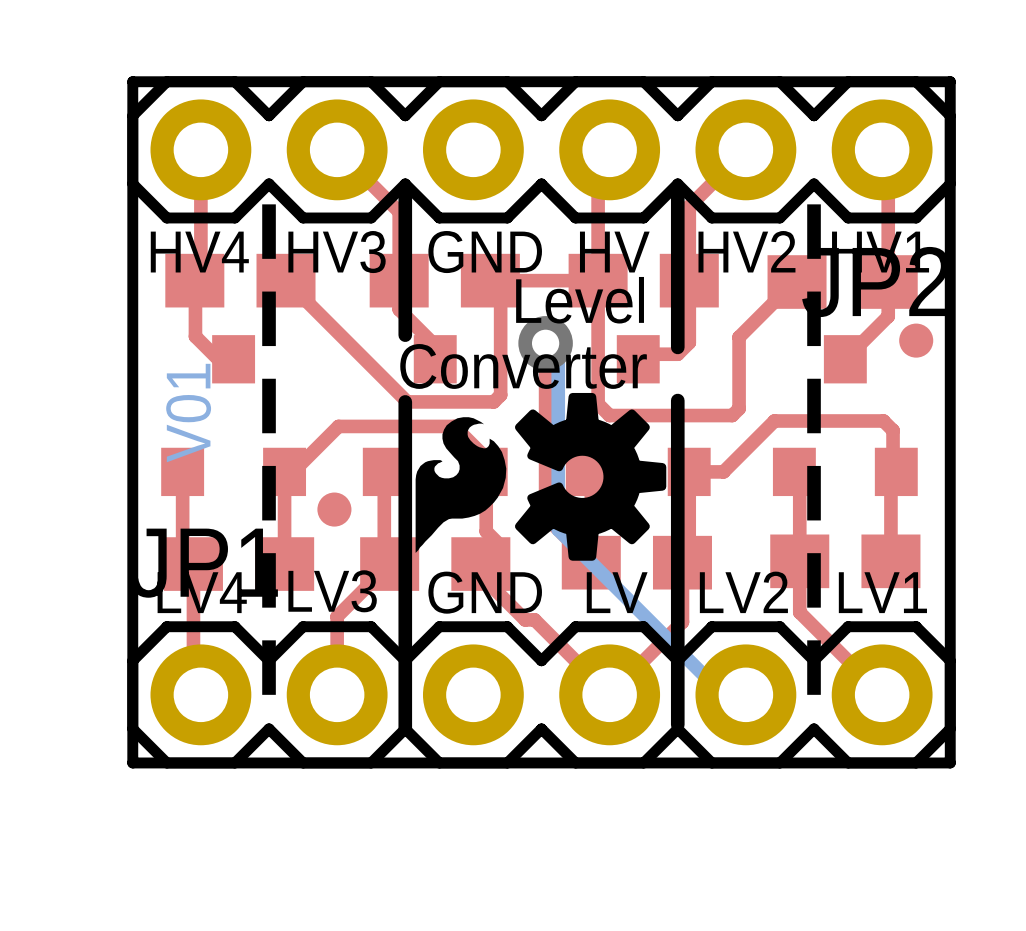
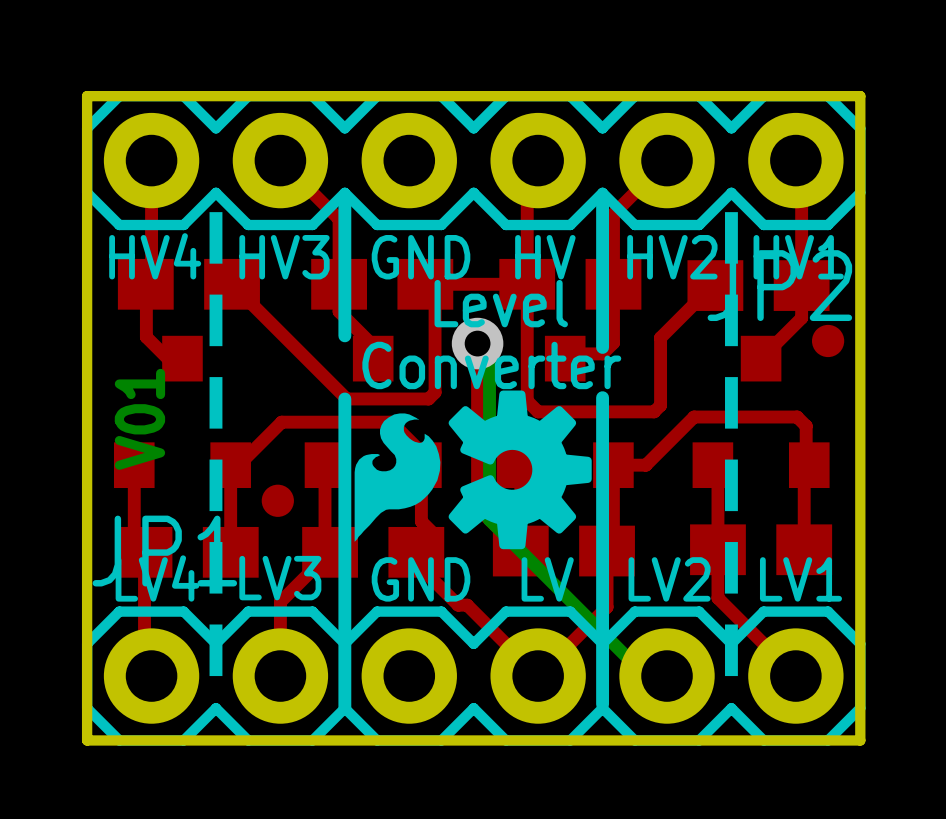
text position: Converter (523, 366) -> Converter (491, 365)

